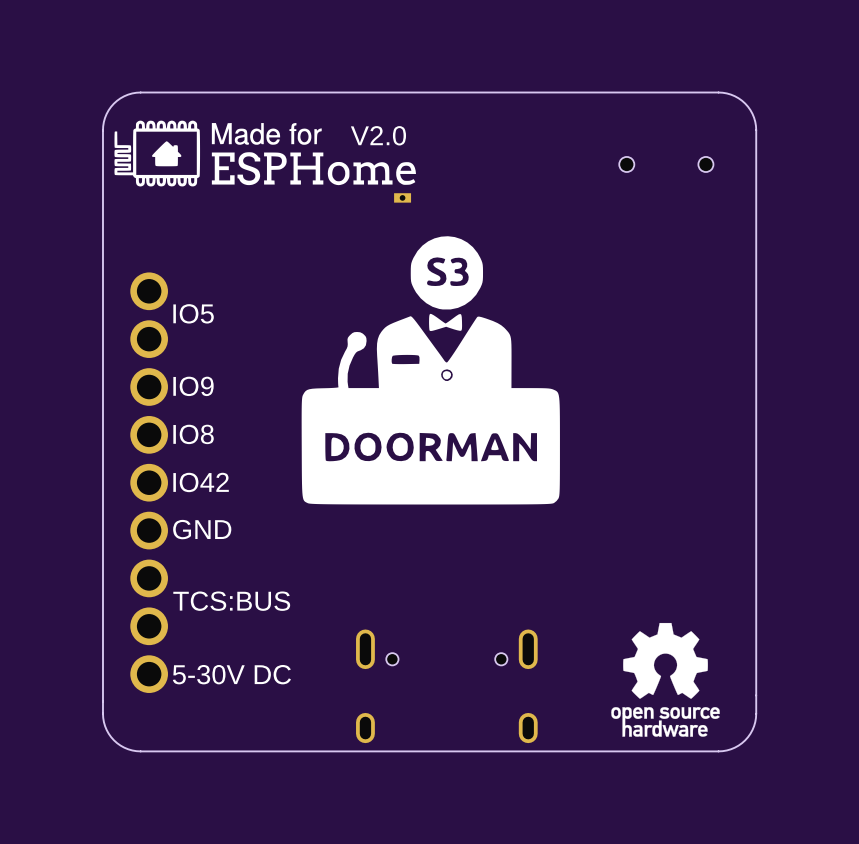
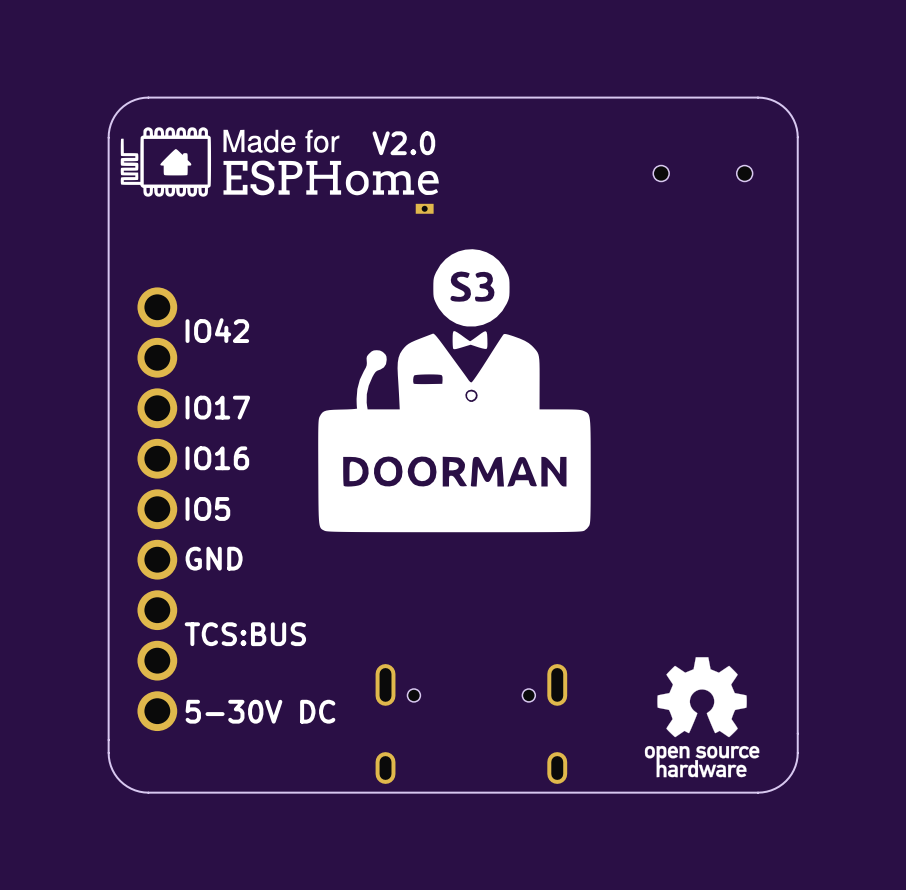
text: IO5 (193, 313) -> IO42 (217, 330)
text: IO9 (193, 386) -> IO17 (217, 407)
text: IO8 (193, 434) -> IO16 (217, 458)
text: IO42 (201, 482) -> IO5 (207, 508)

